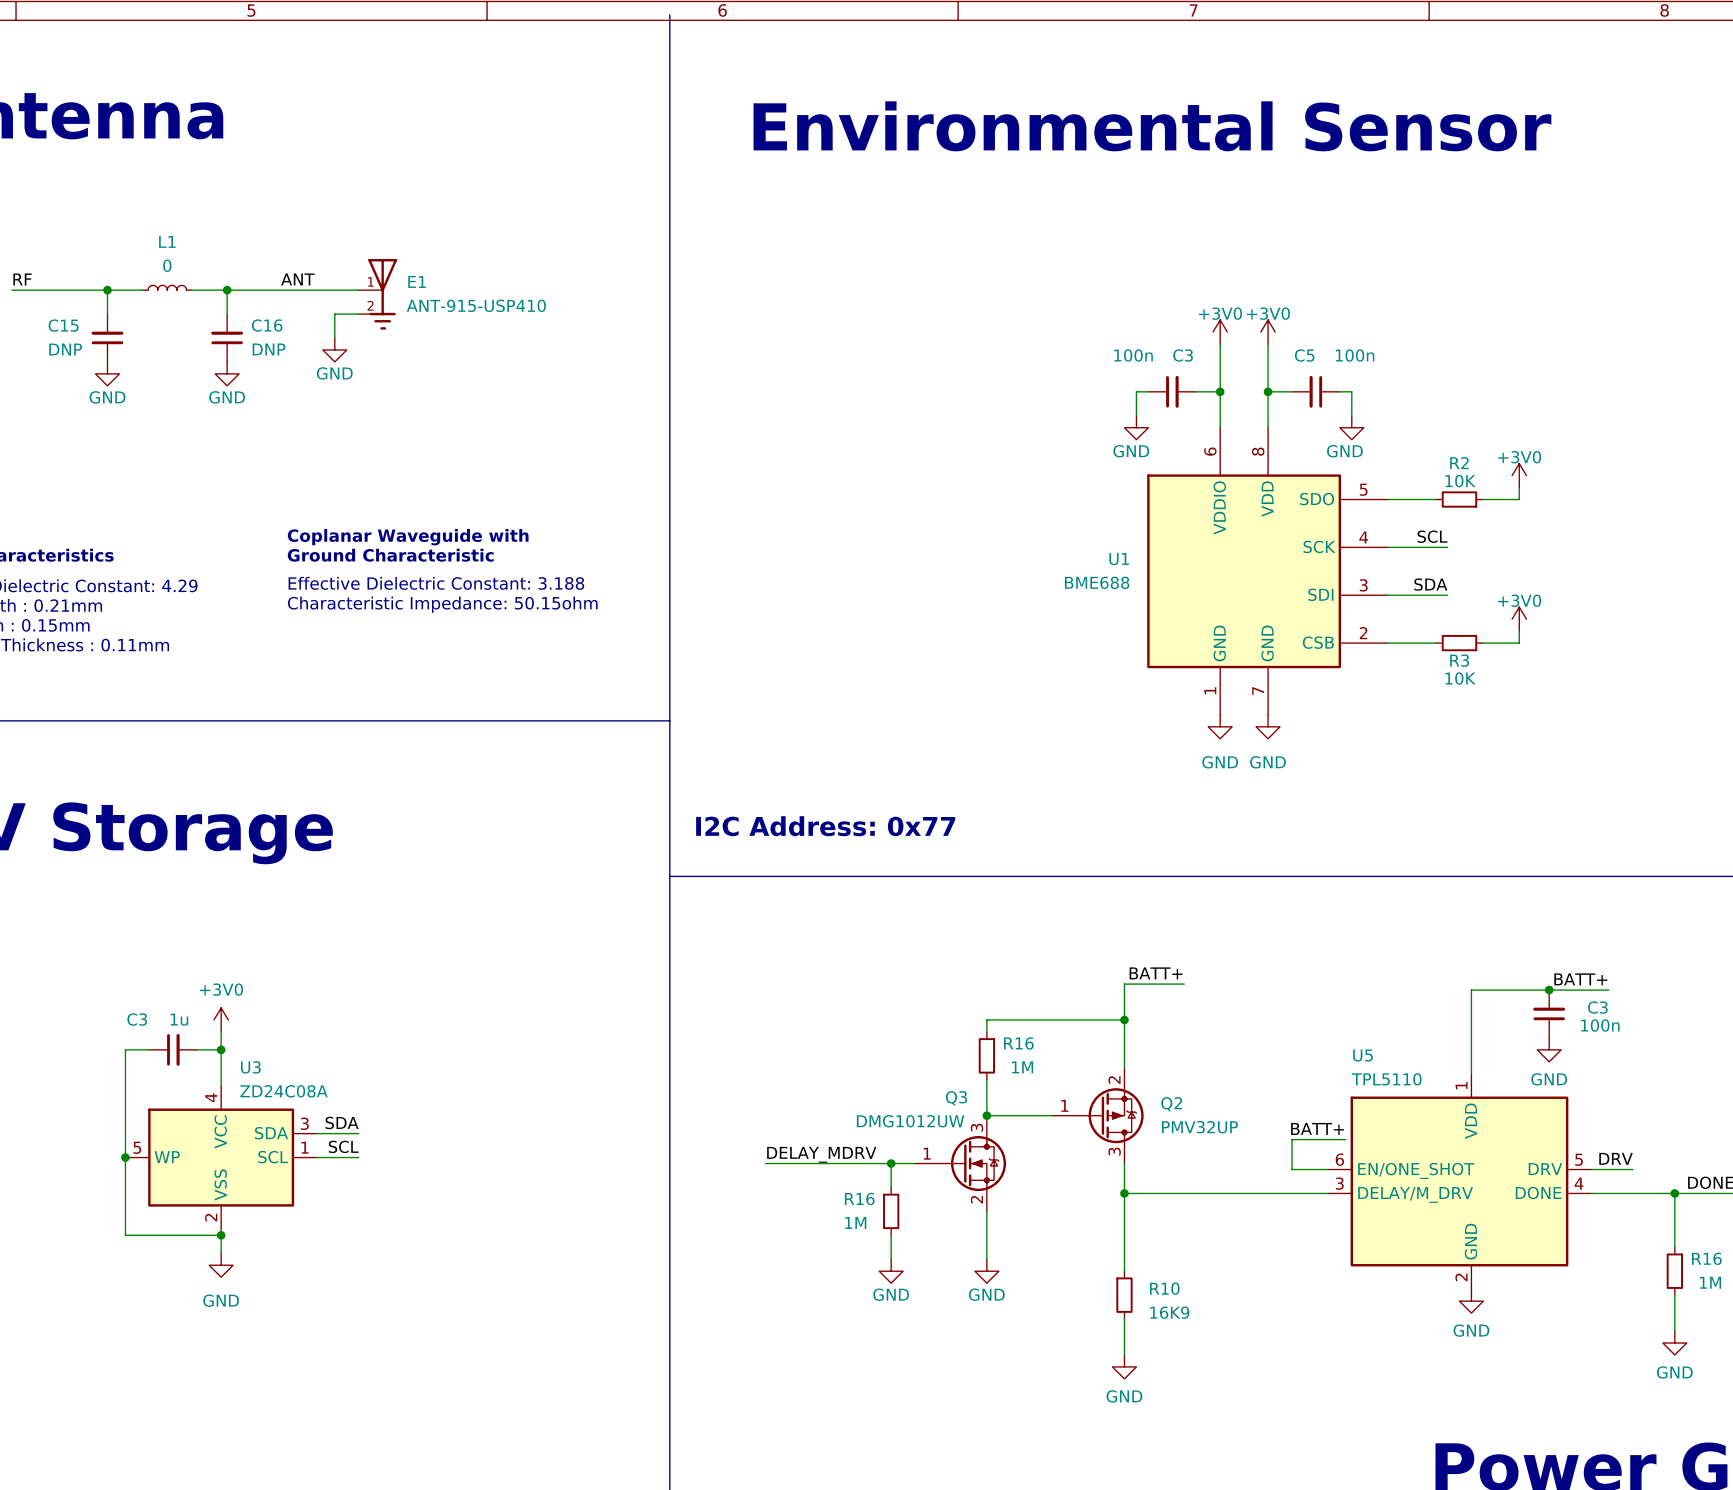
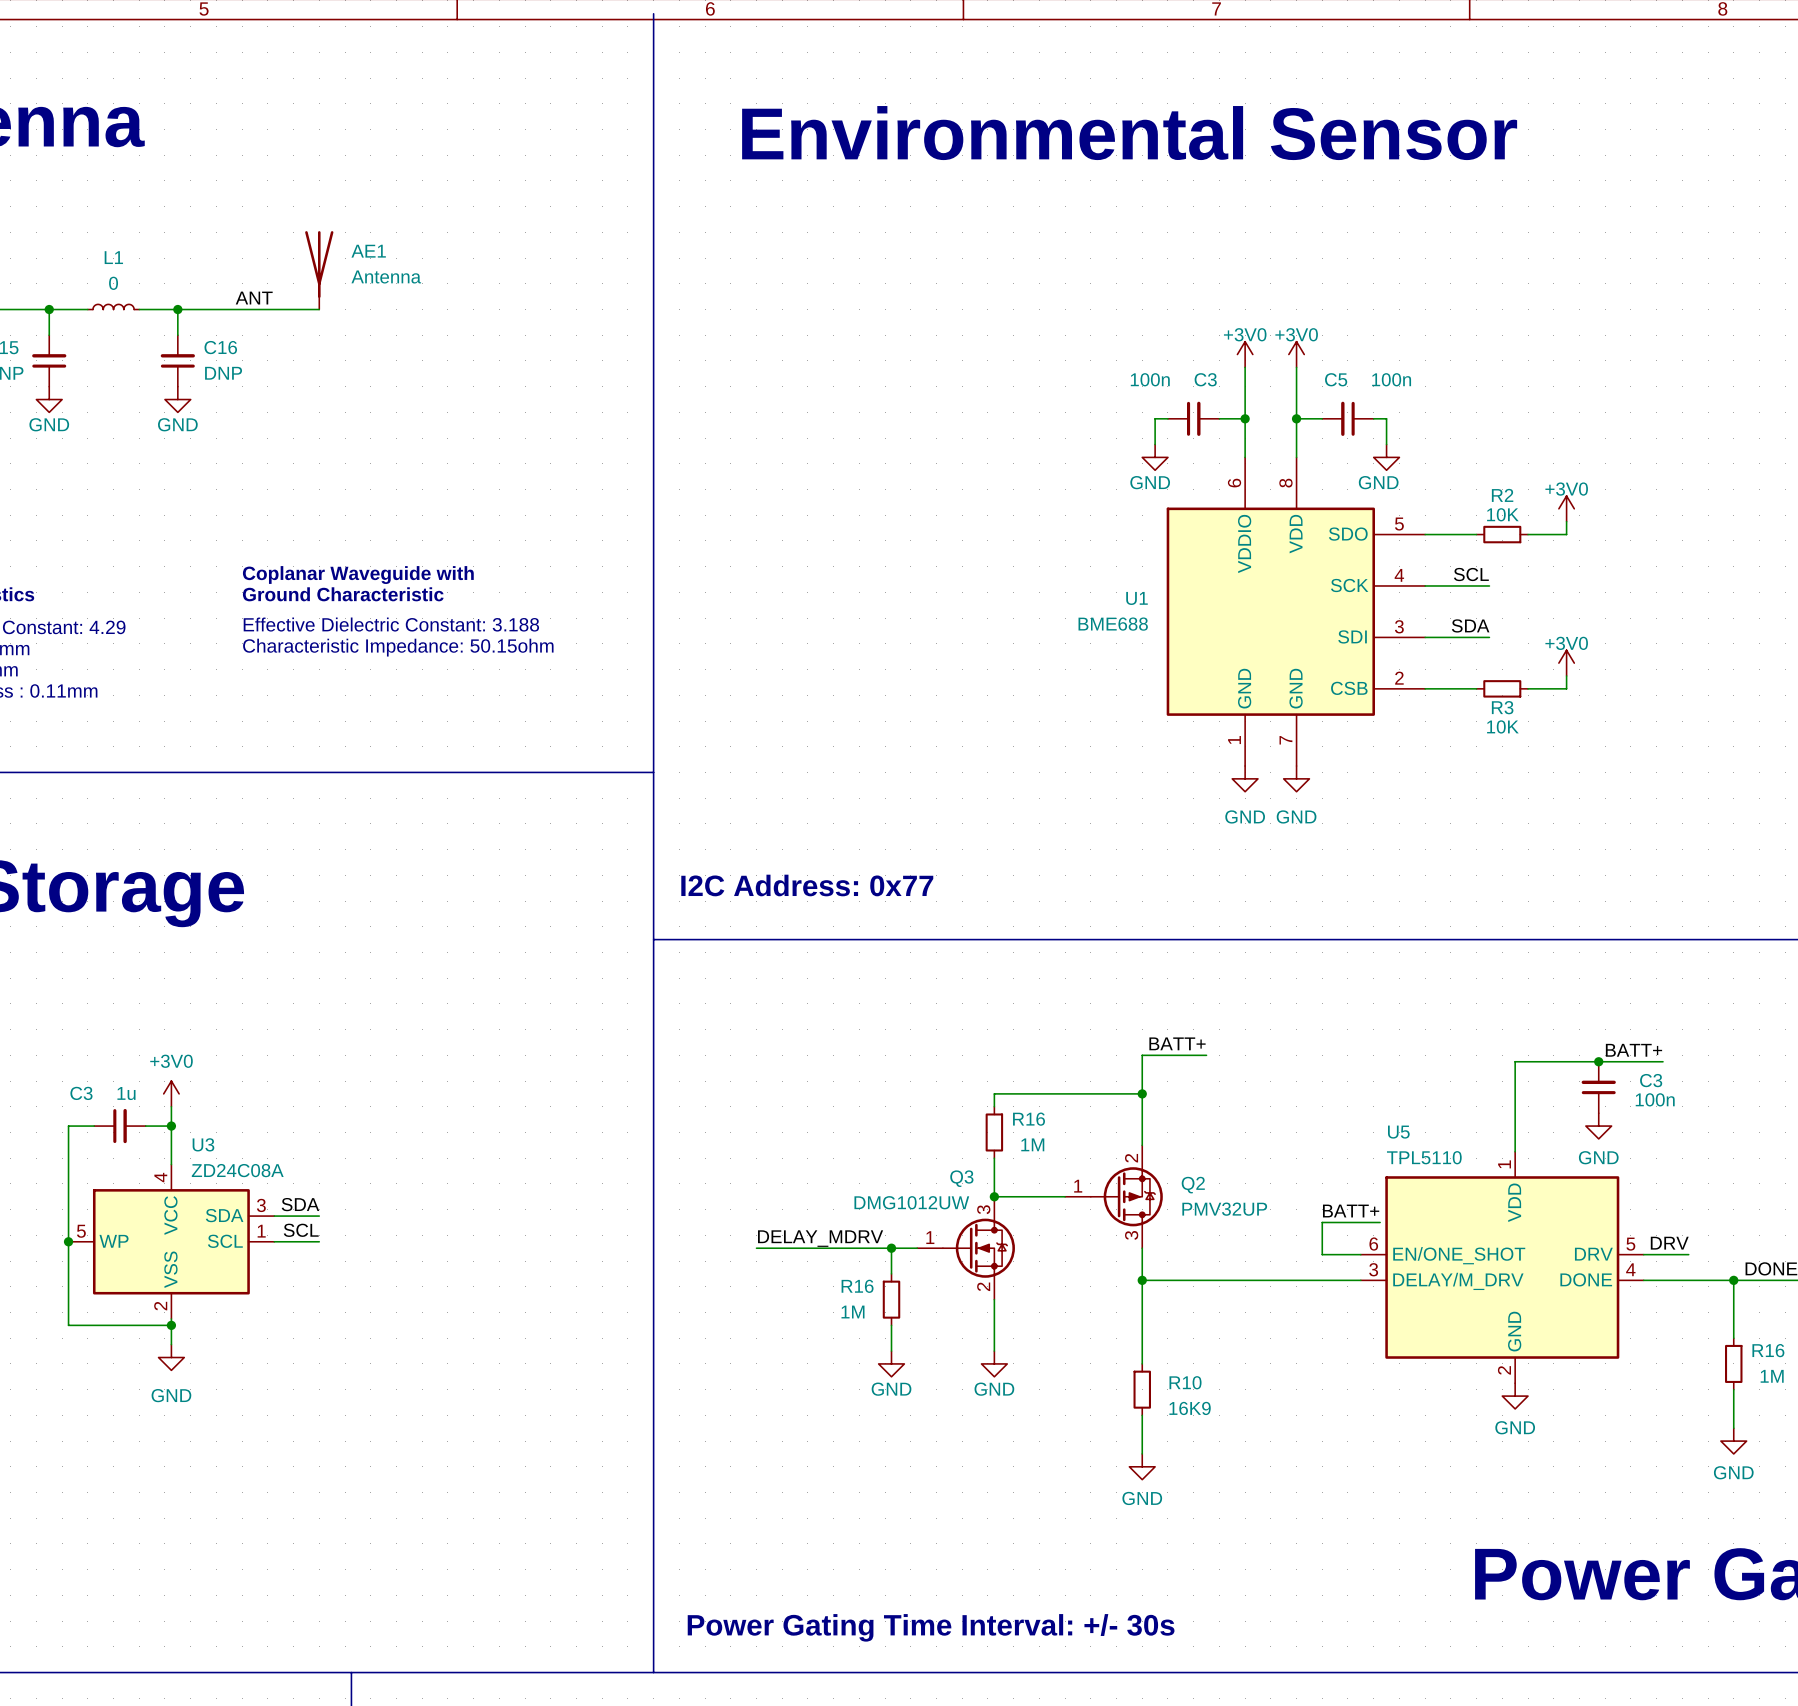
AE1: none -> Antenna (319, 270)
E1: ANT-915-USP410 (377, 294) -> none
wire: (358, 314) (334, 314) (334, 337) -> none
power symbol: GND (334, 349) -> none

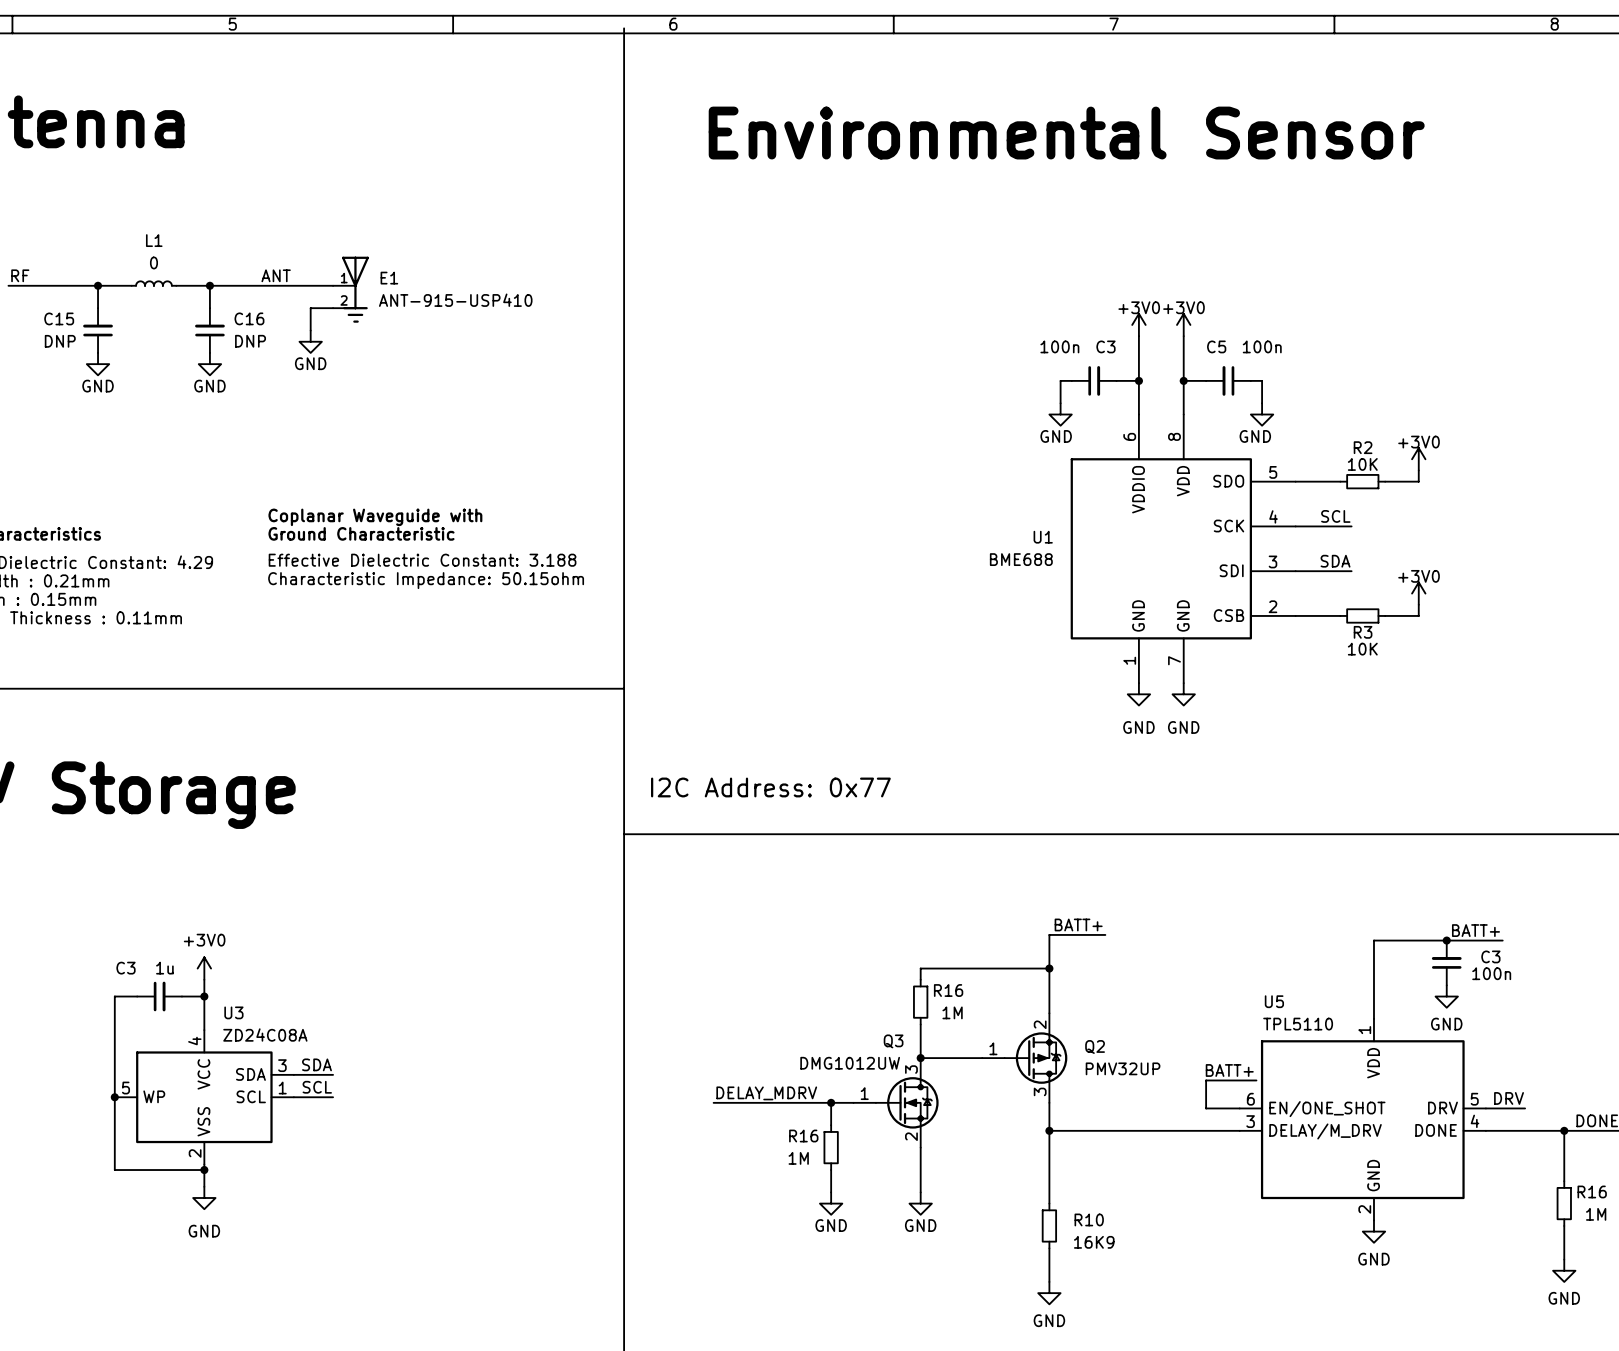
AE1: Antenna (319, 270) -> none
E1: none -> ANT-915-USP410 (350, 289)
wire: none -> (333, 308) (310, 308) (310, 330)
power symbol: none -> GND (310, 341)

